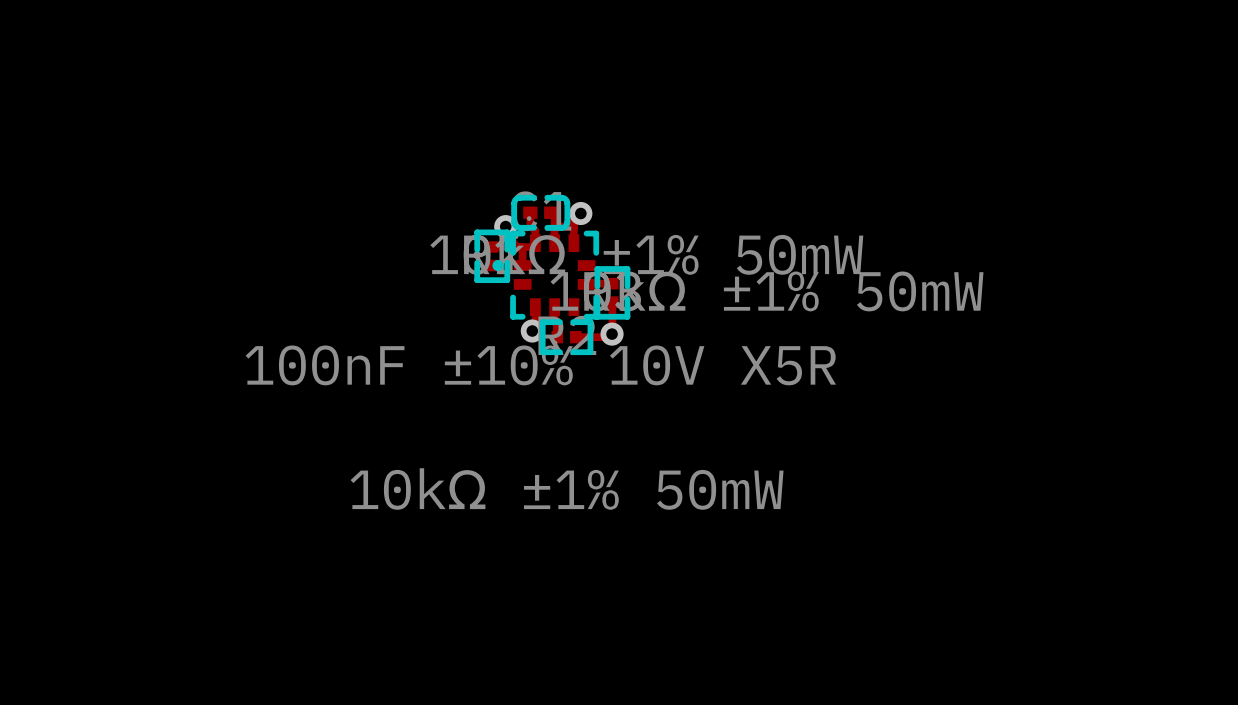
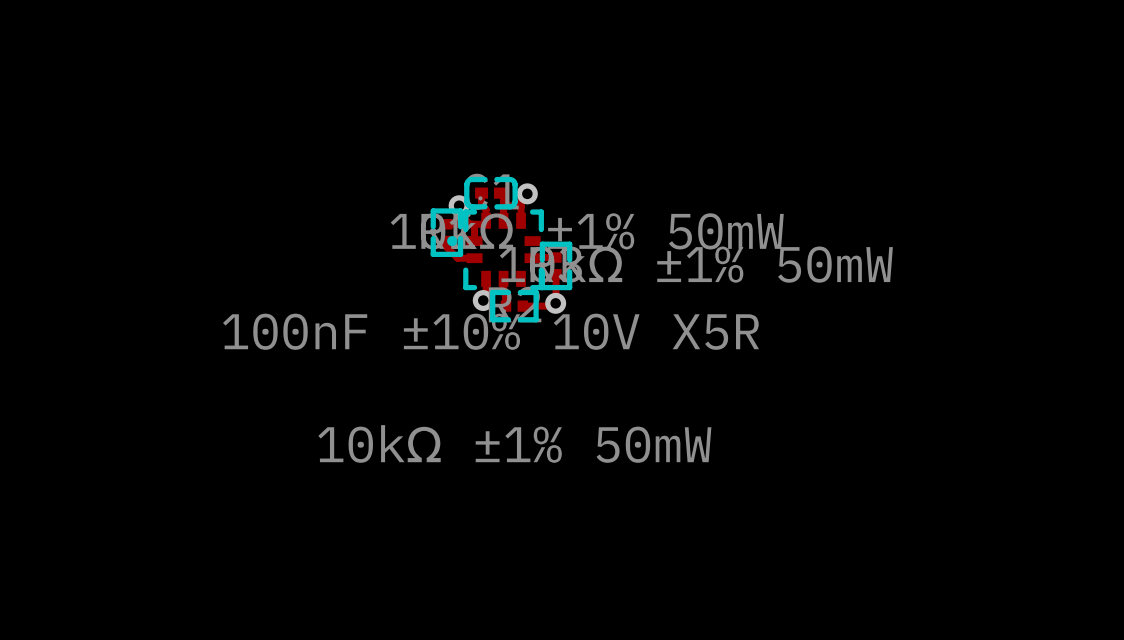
track: none -> (446, 241) (446, 247) (457, 258) (474, 258)

